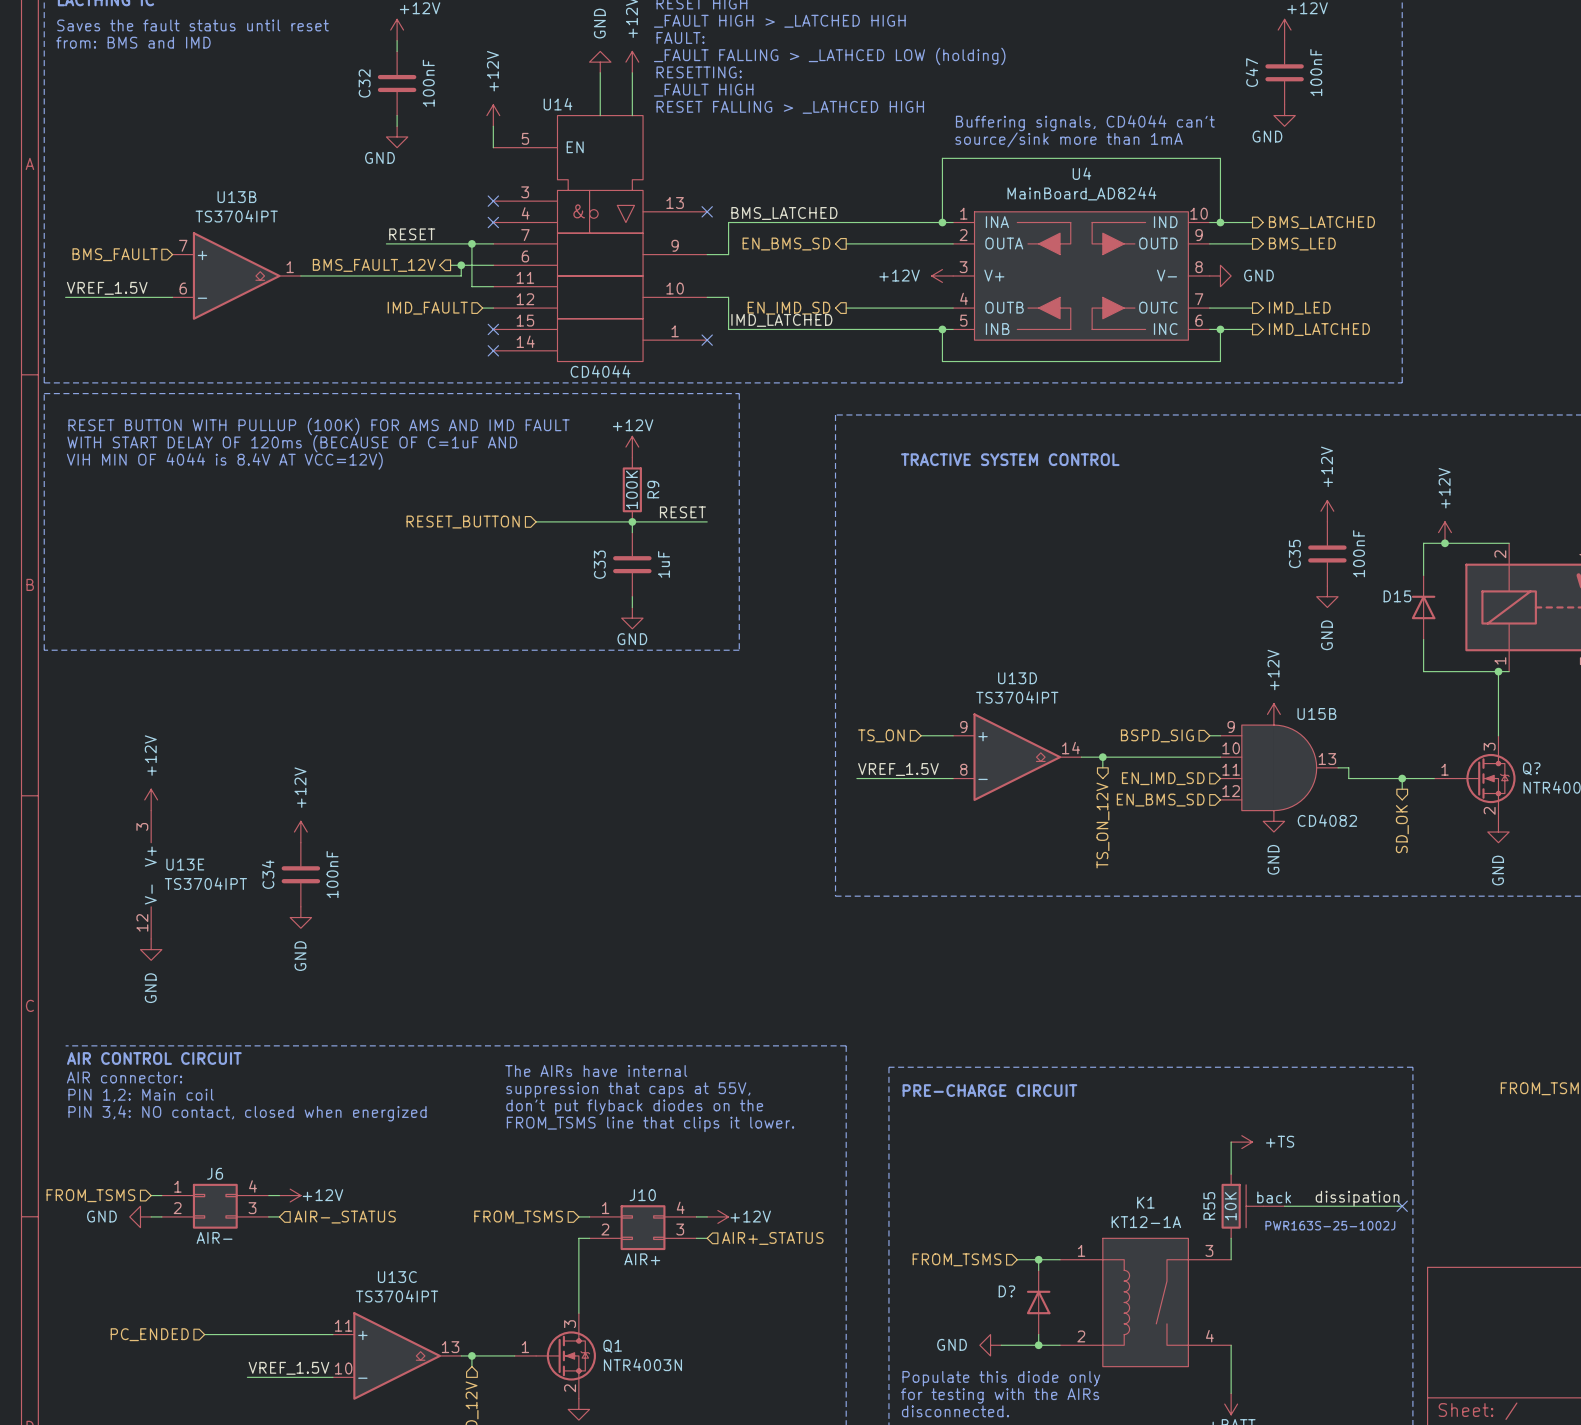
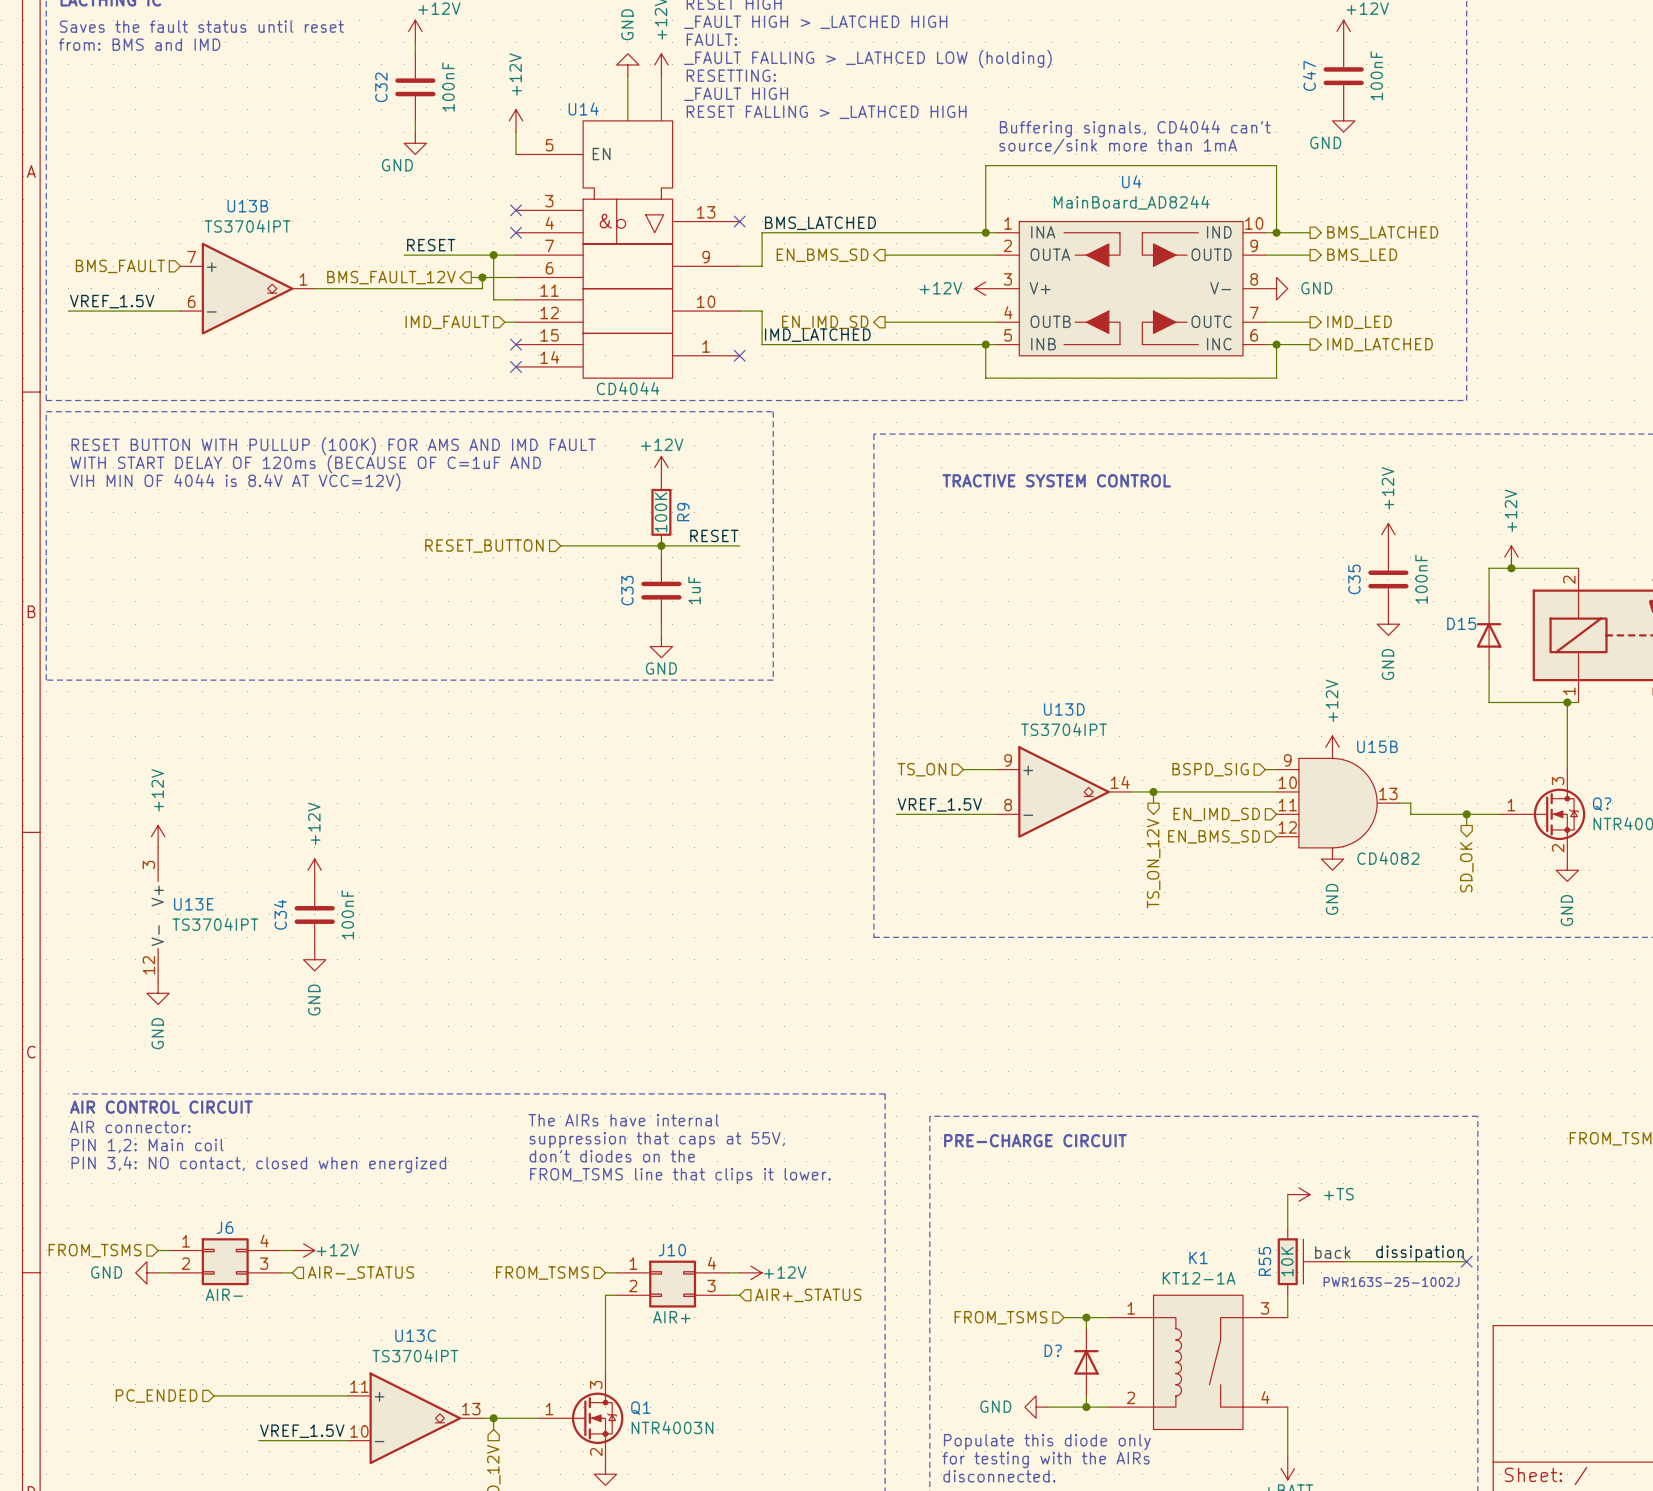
text: don't put flyback diodes on the (634, 1107) -> don't diodes on the (612, 1156)

